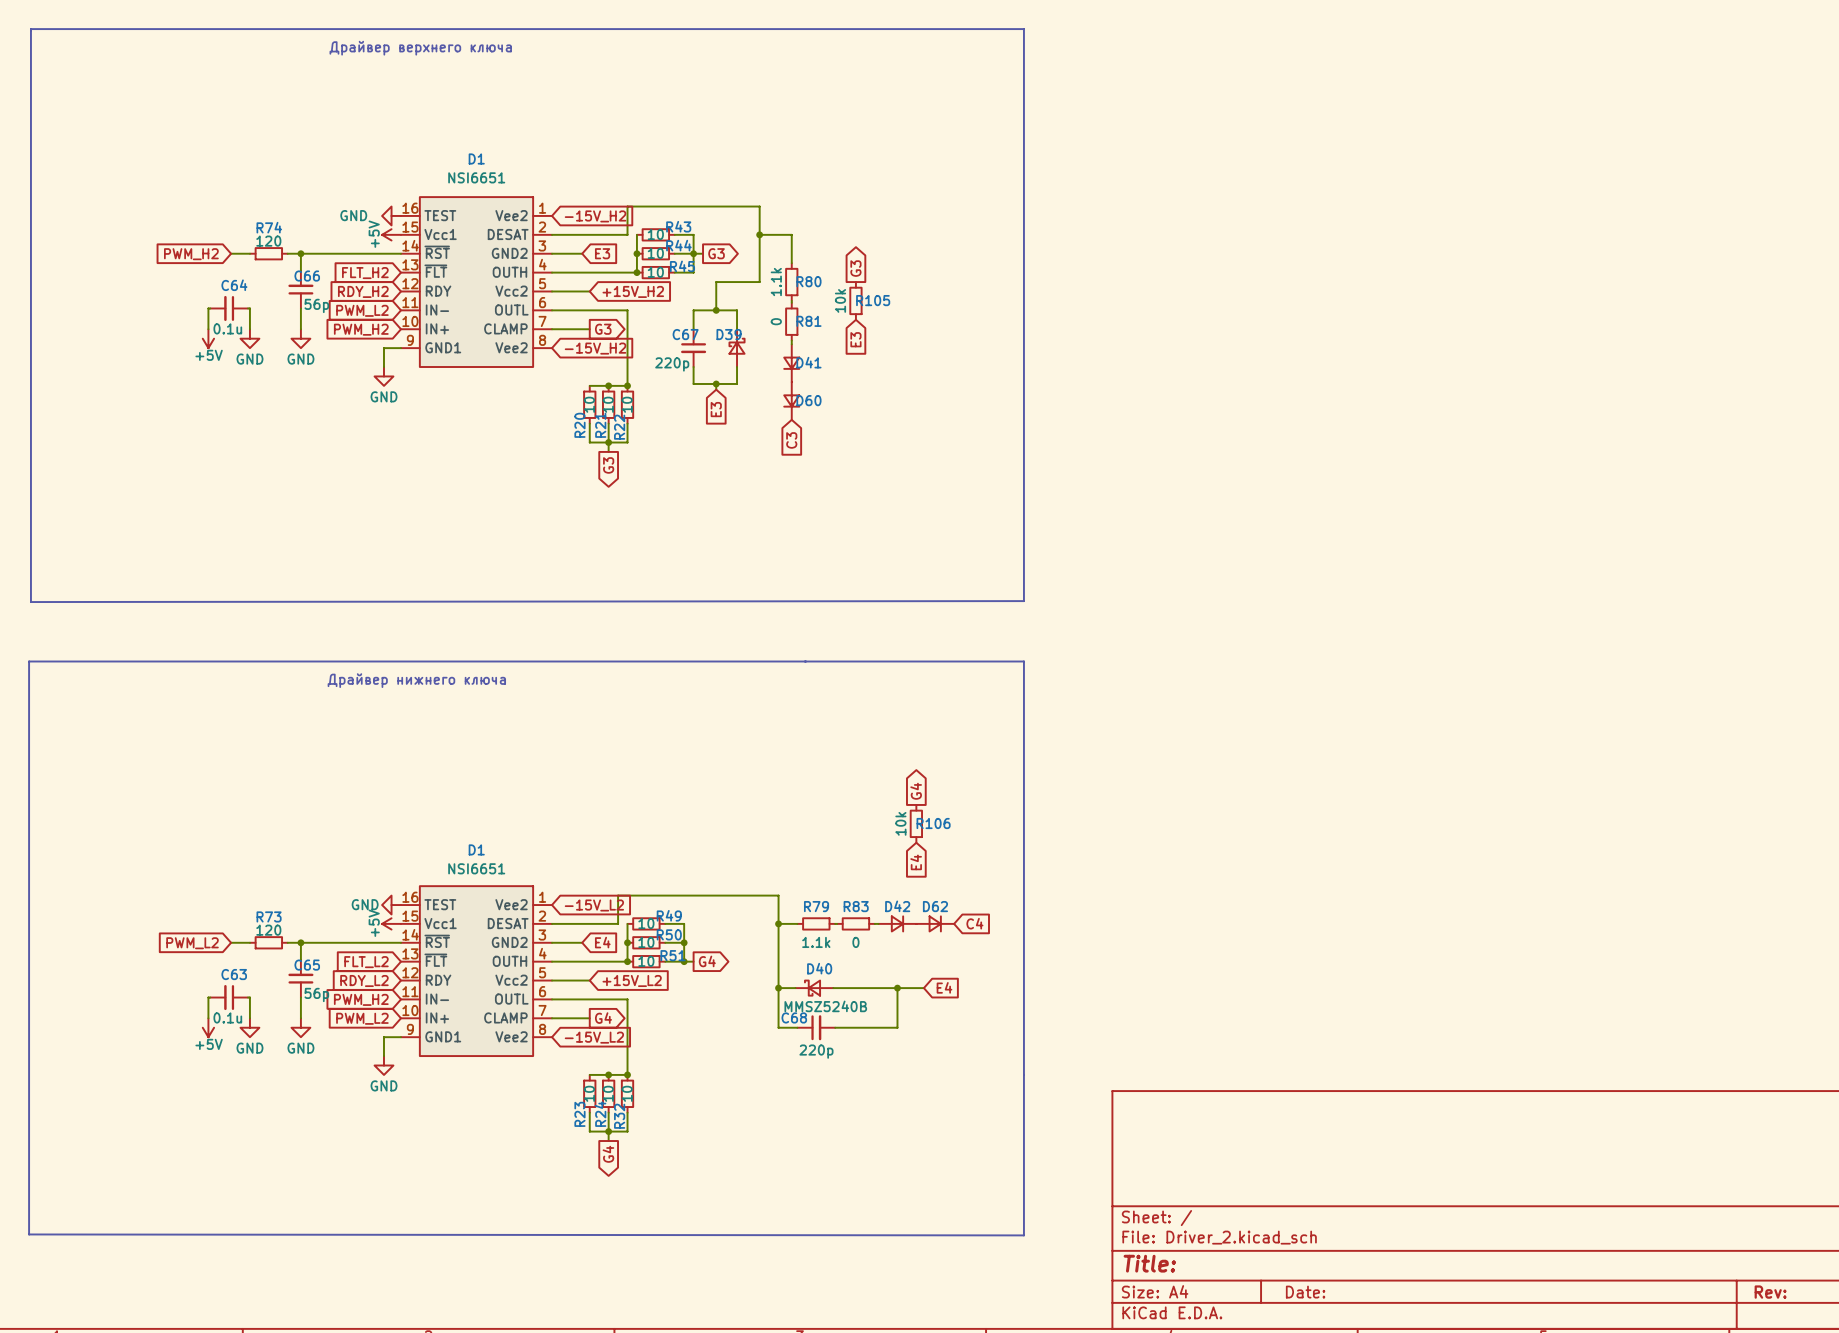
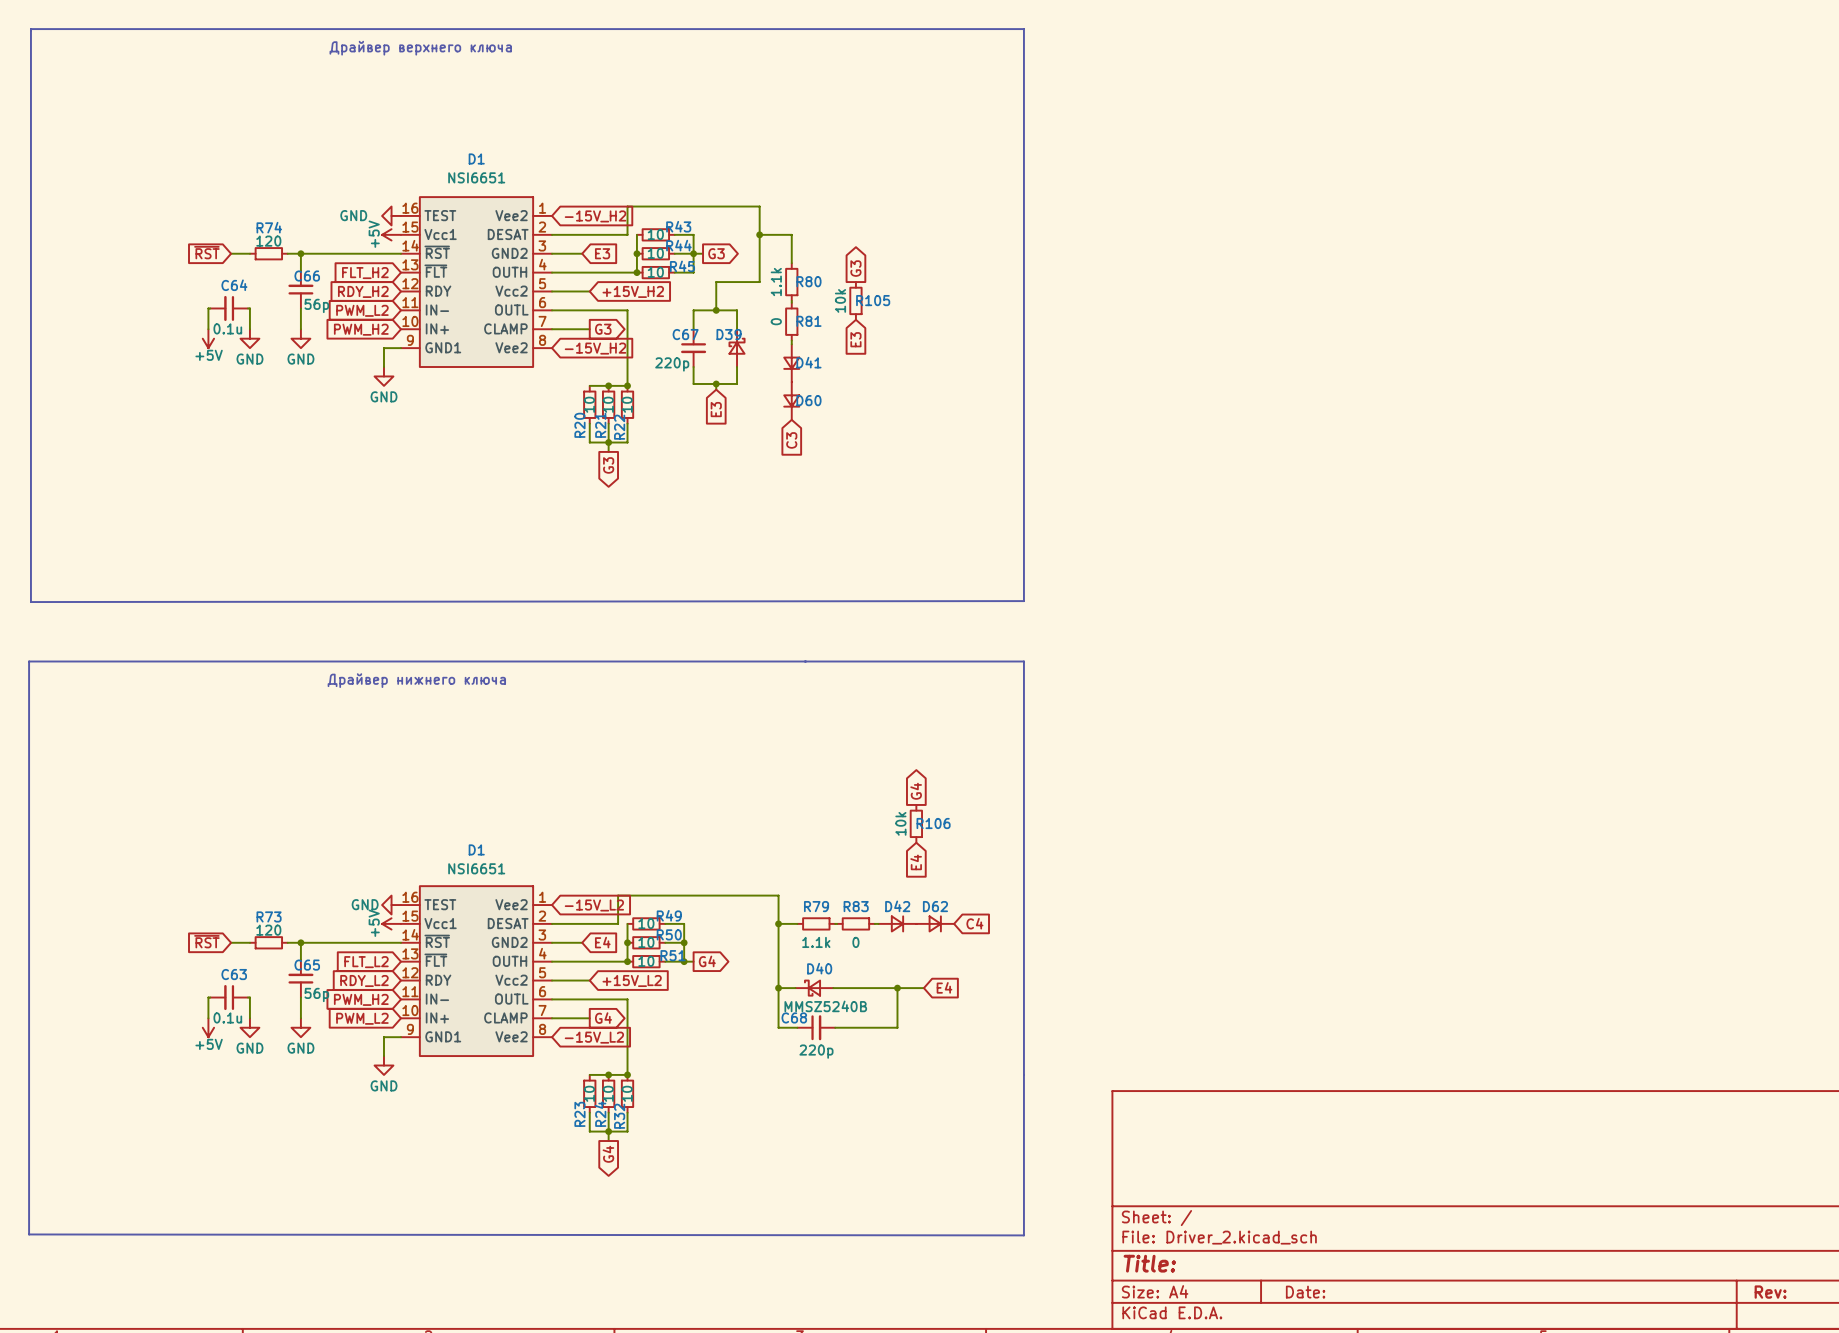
global label: PWM_H2 (191, 254) -> ~{RST} (206, 252)
global label: PWM_L2 (192, 943) -> ~{RST} (206, 941)

